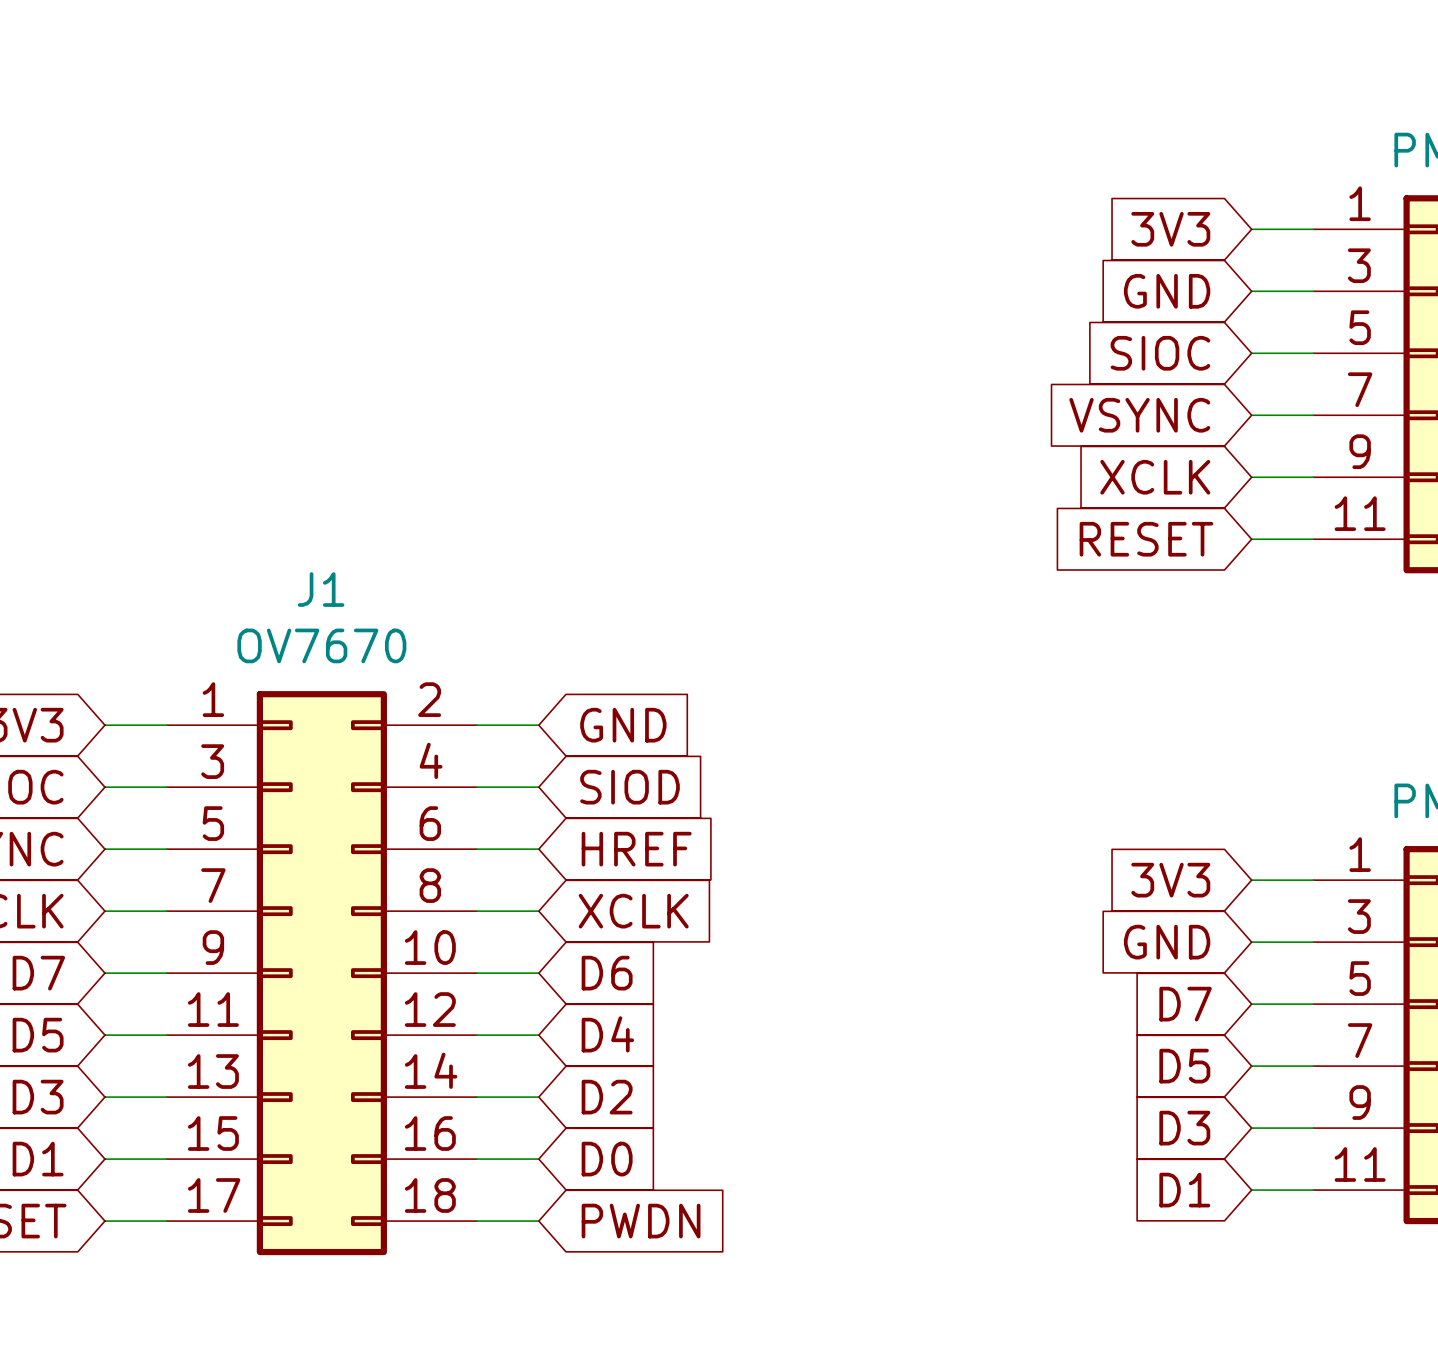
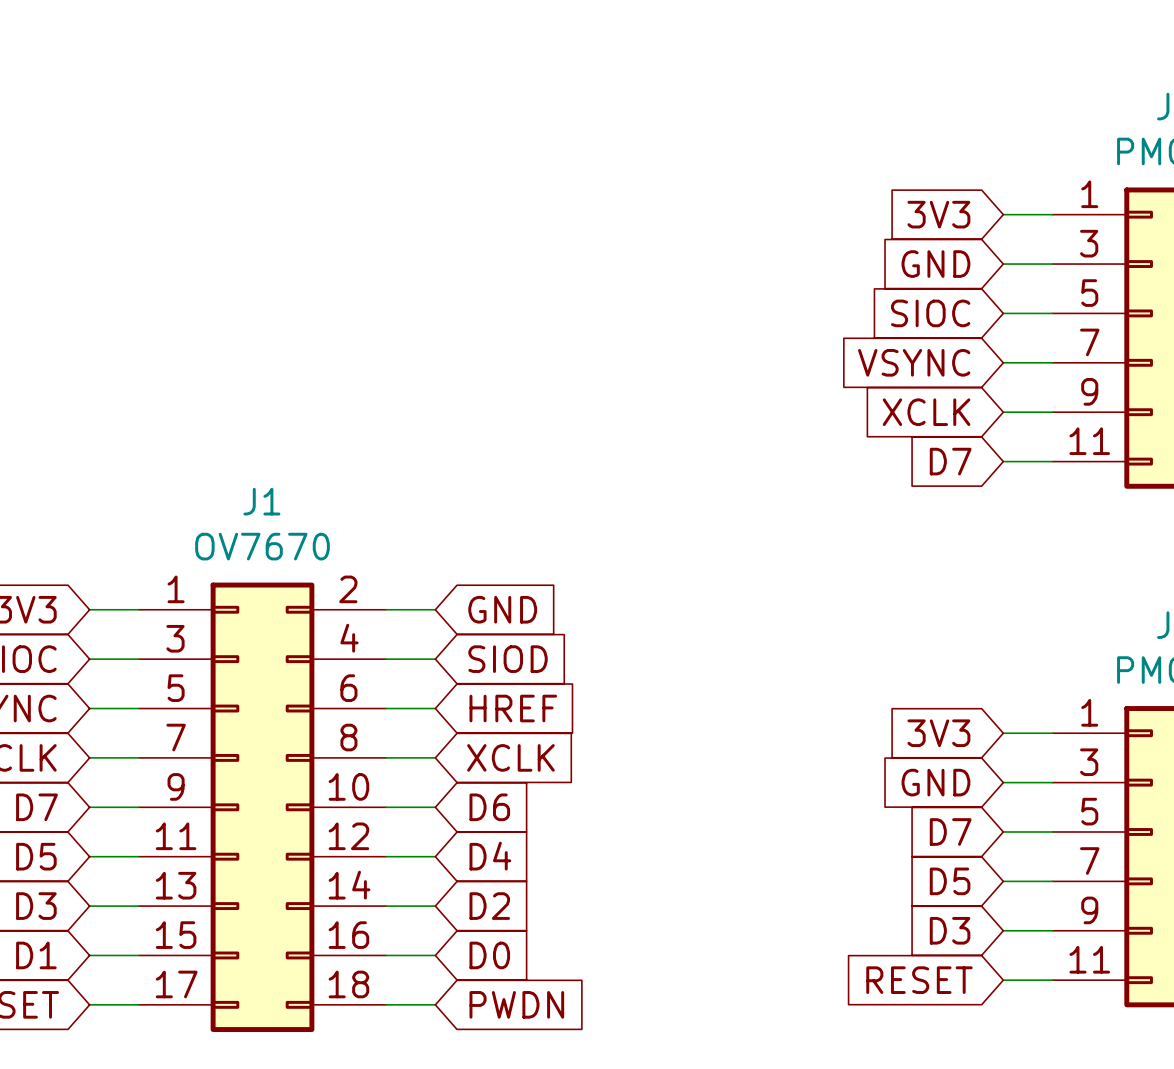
global label: RESET (1146, 539) -> D7 (950, 461)
global label: D1 (1184, 1190) -> RESET (919, 980)

